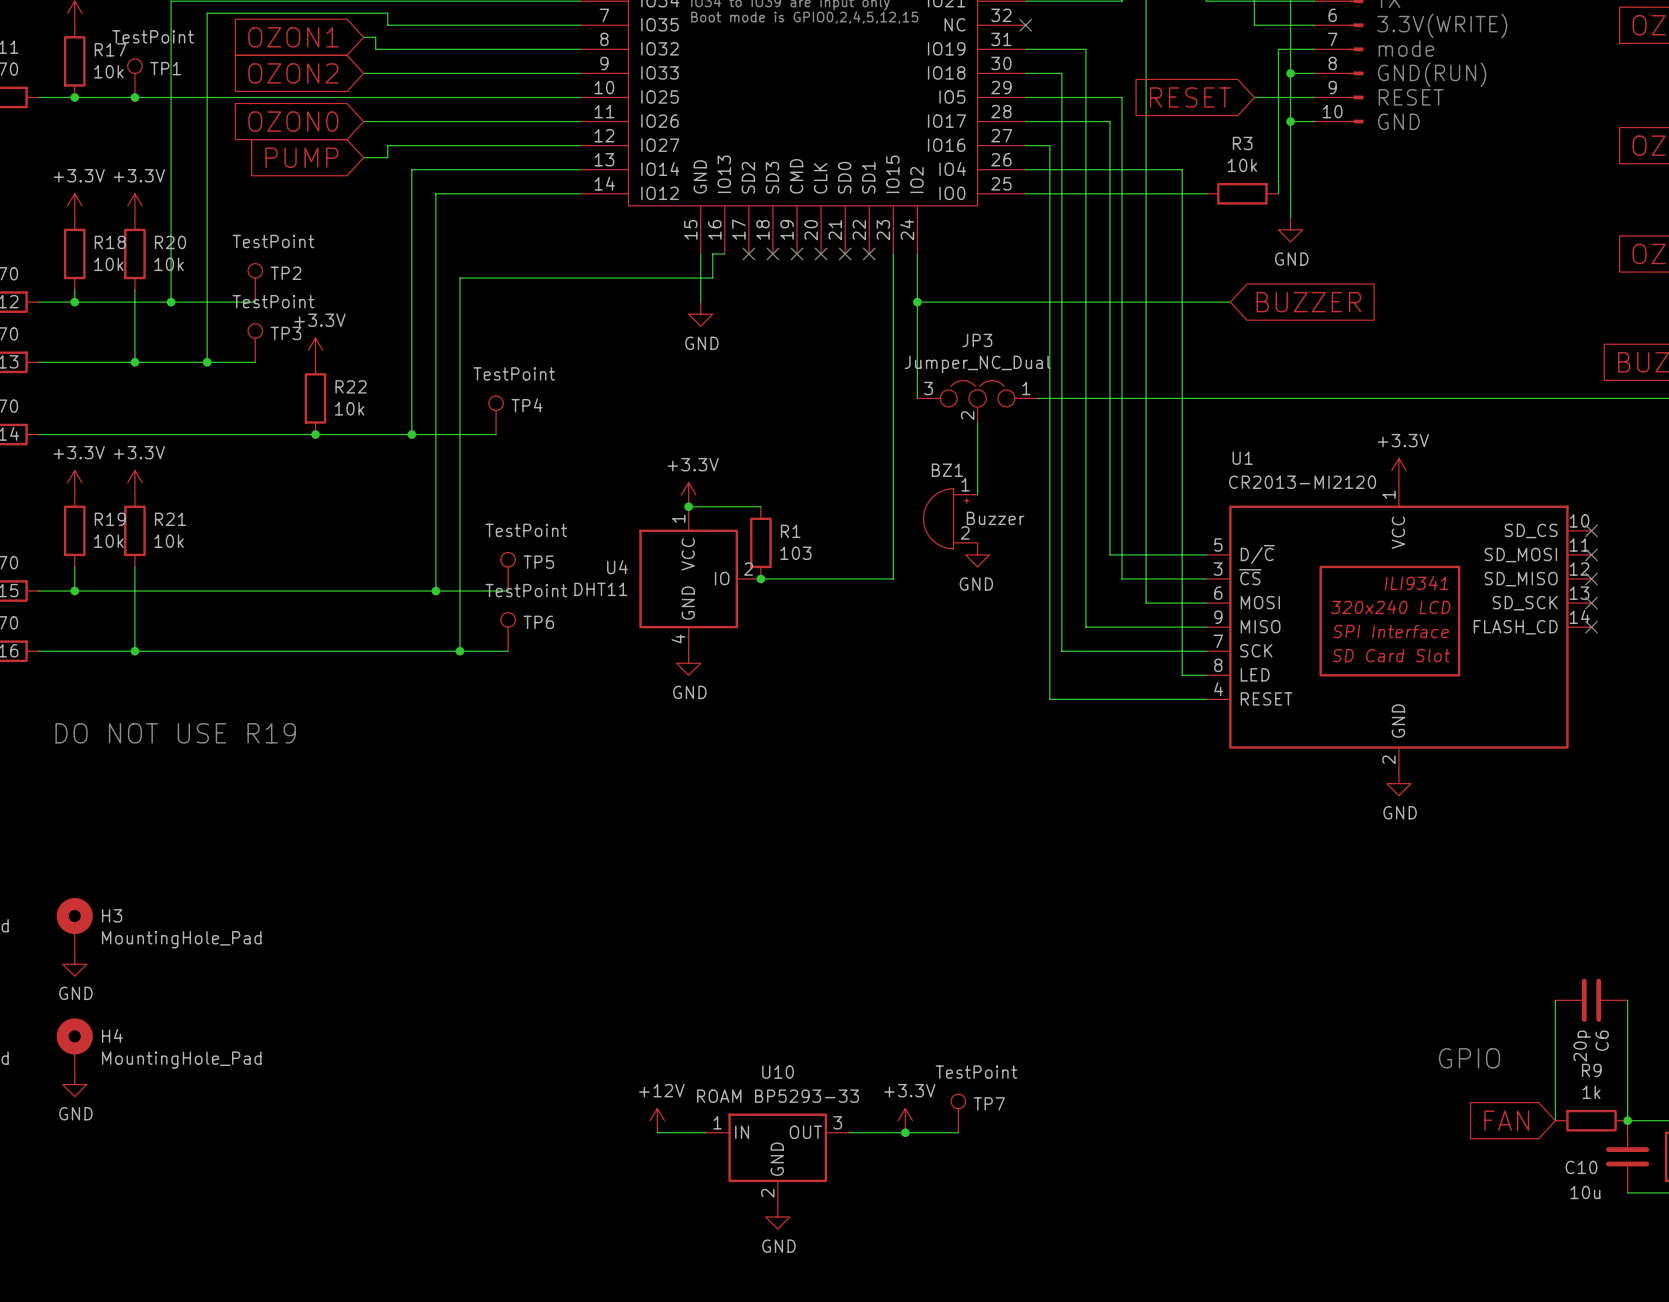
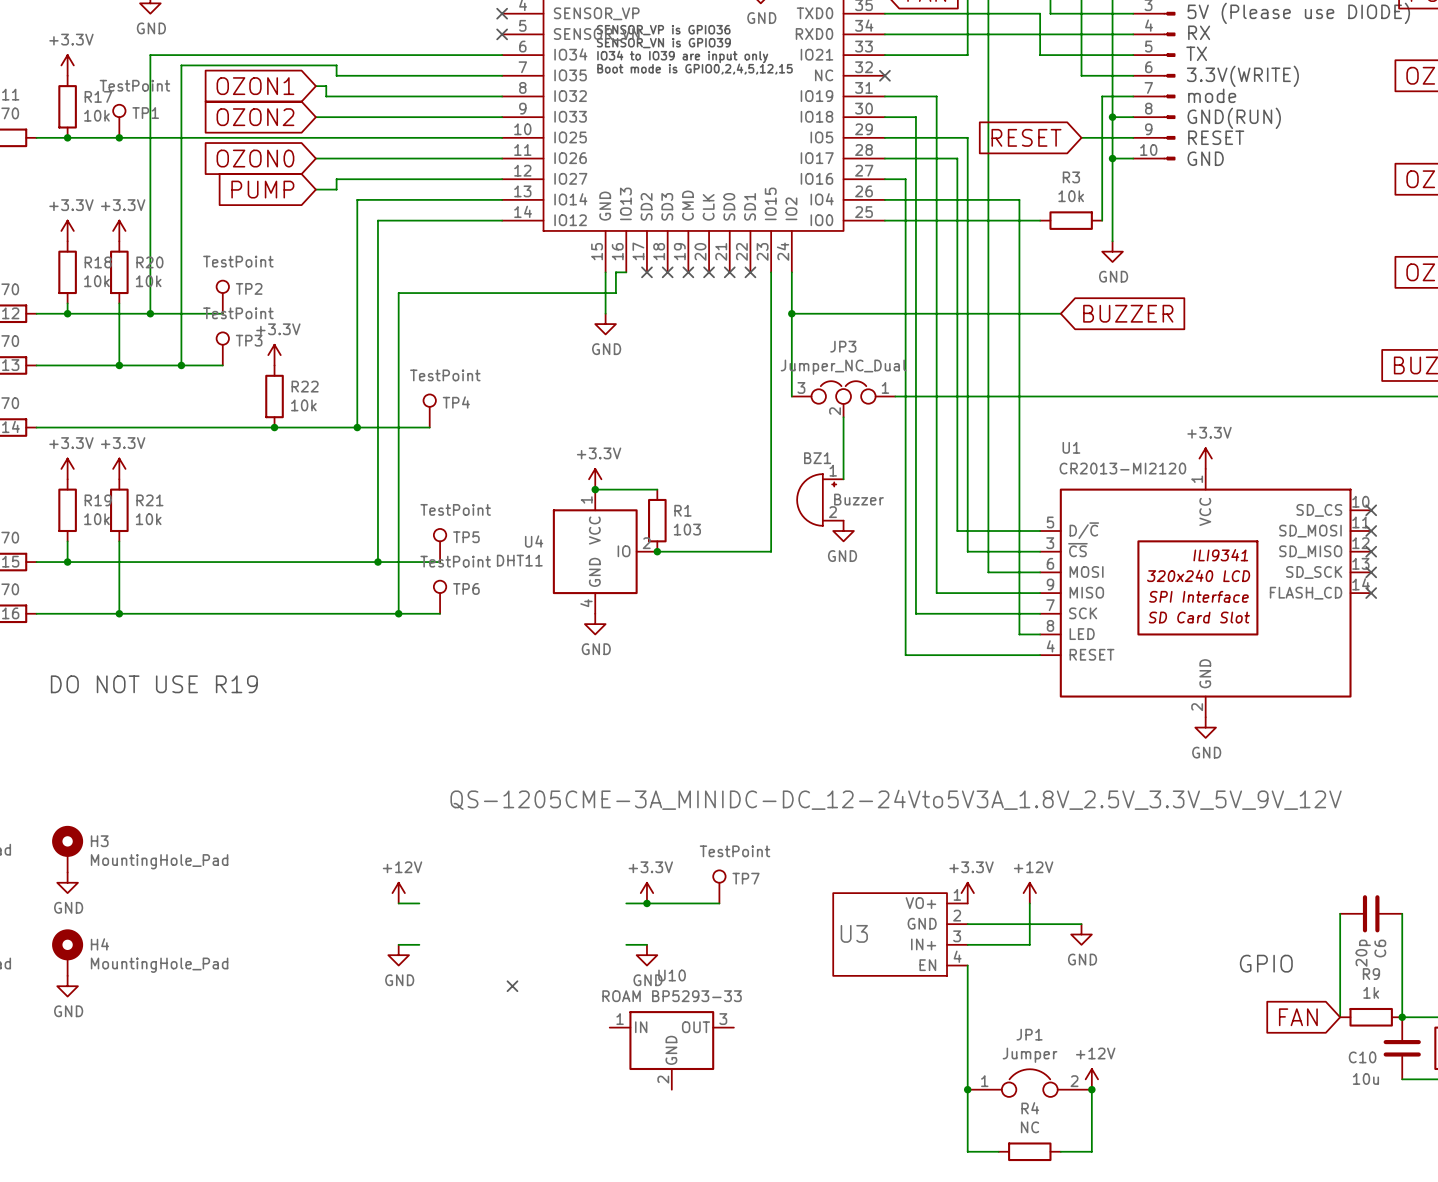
power symbol: none -> +12V (398, 893)
power symbol: none -> +3.3V (646, 893)
power symbol: none -> +3.3V (967, 893)
power symbol: none -> +12V (1029, 893)
wire: none -> (398, 903) (419, 903)
junction: none -> (646, 903)
wire: none -> (1029, 903) (1029, 944) (967, 944)
wire: none -> (967, 924) (1081, 924)
U3: none -> QS-1205CME-3A_MINIDC-DC_12-24Vto5V3A_1.8V_2.5V_3.3V_5V_9V_12V (900, 934)
power symbol: none -> GND (1081, 934)
wire: none -> (398, 944) (419, 944)
wire: none -> (626, 944) (646, 944)
power symbol: none -> GND (398, 955)
wire: none -> (967, 965) (967, 1151) (998, 1151)
no-connect mark: none -> (512, 986)
TP7 position: (958, 1113) -> (719, 886)
power symbol: +12V (657, 1120) -> none
power symbol: +3.3V (905, 1120) -> none
wire: (657, 1132) (705, 1132) -> none
wire: (849, 1132) (958, 1132) -> (626, 903) (719, 903)
junction: (905, 1132) -> none
power symbol: none -> +12V (1091, 1079)
JP1: none -> Jumper (1029, 1083)
junction: none -> (967, 1089)
wire: none -> (1091, 1089) (1091, 1151) (1060, 1151)
junction: none -> (1091, 1089)
power symbol position: GND (777, 1216) -> GND (646, 955)
R4: none -> NC (1029, 1151)

